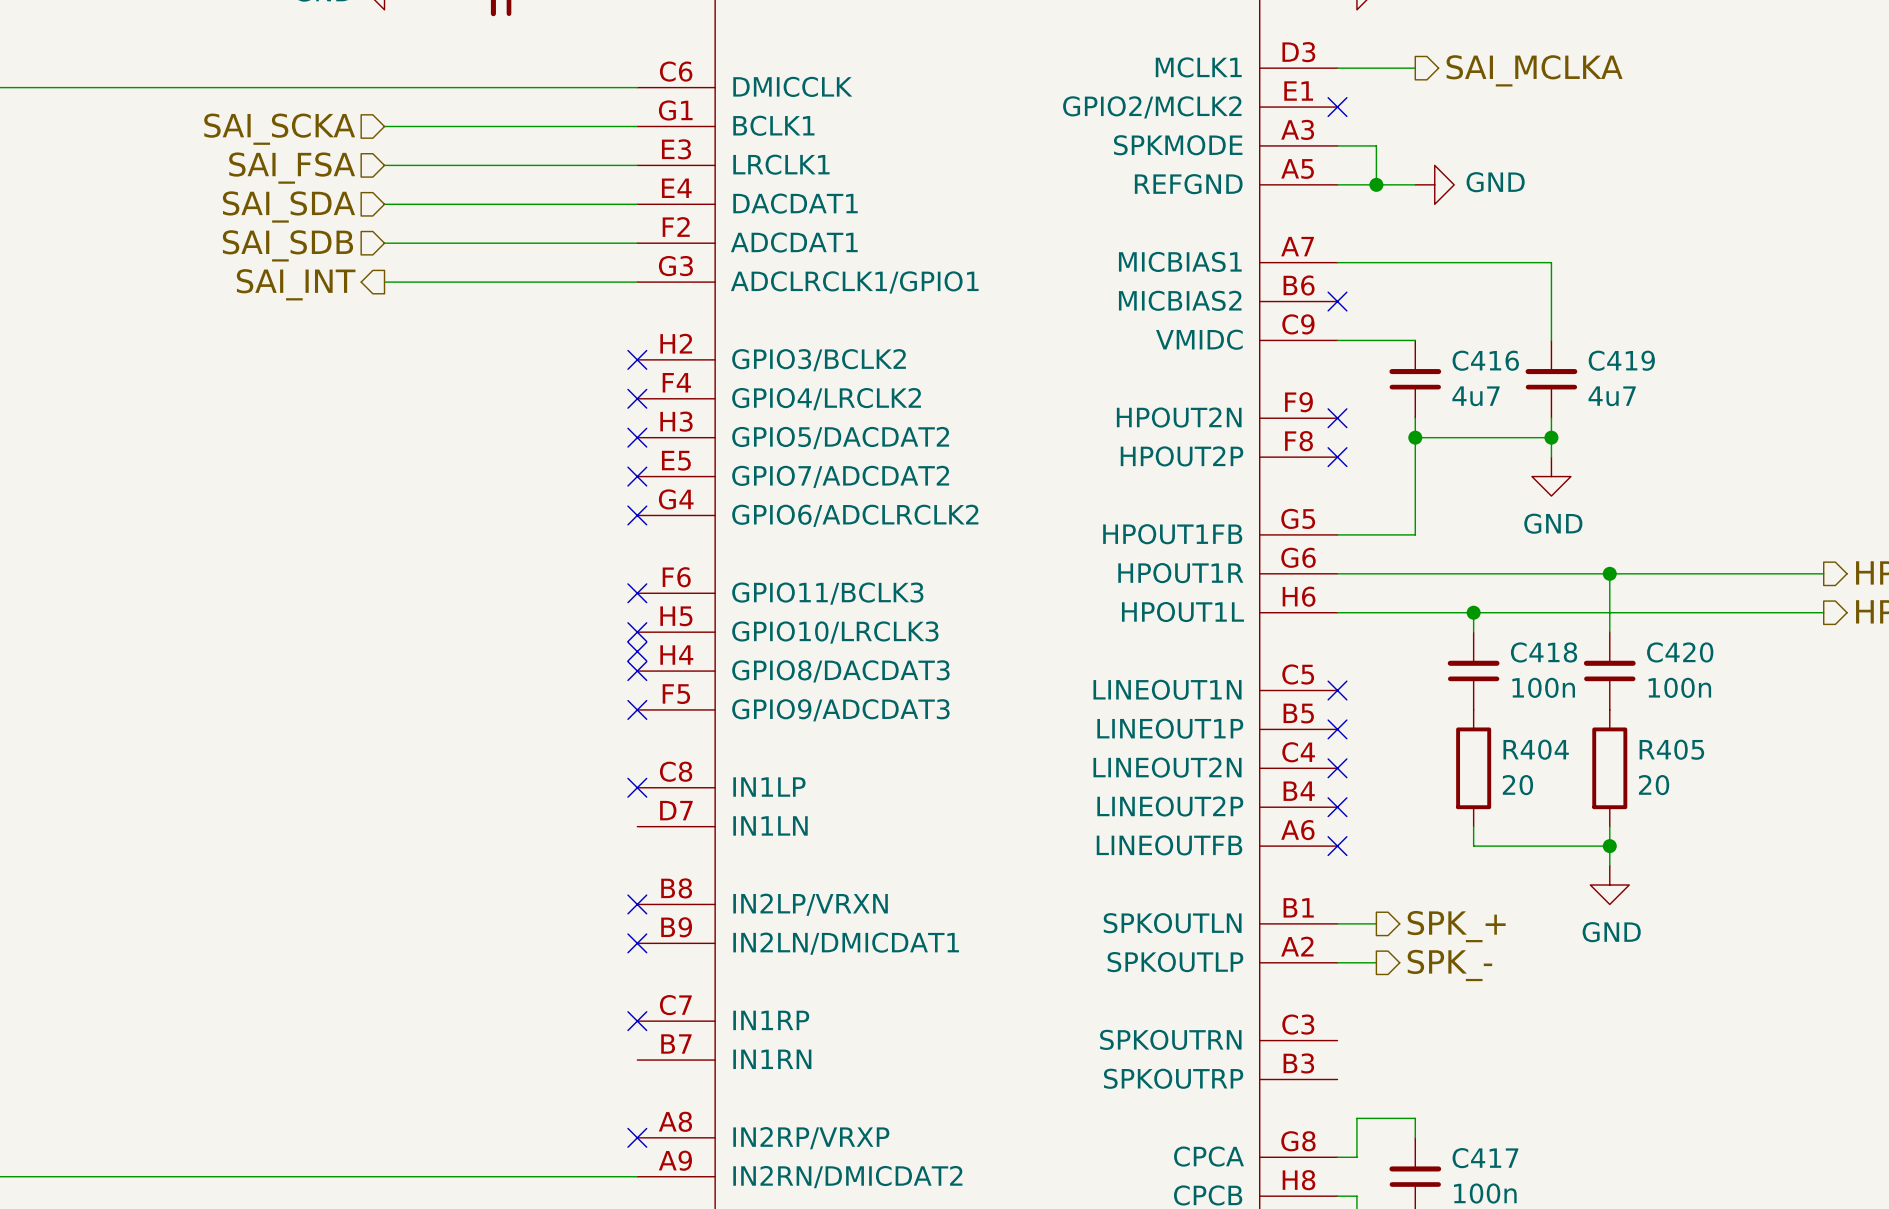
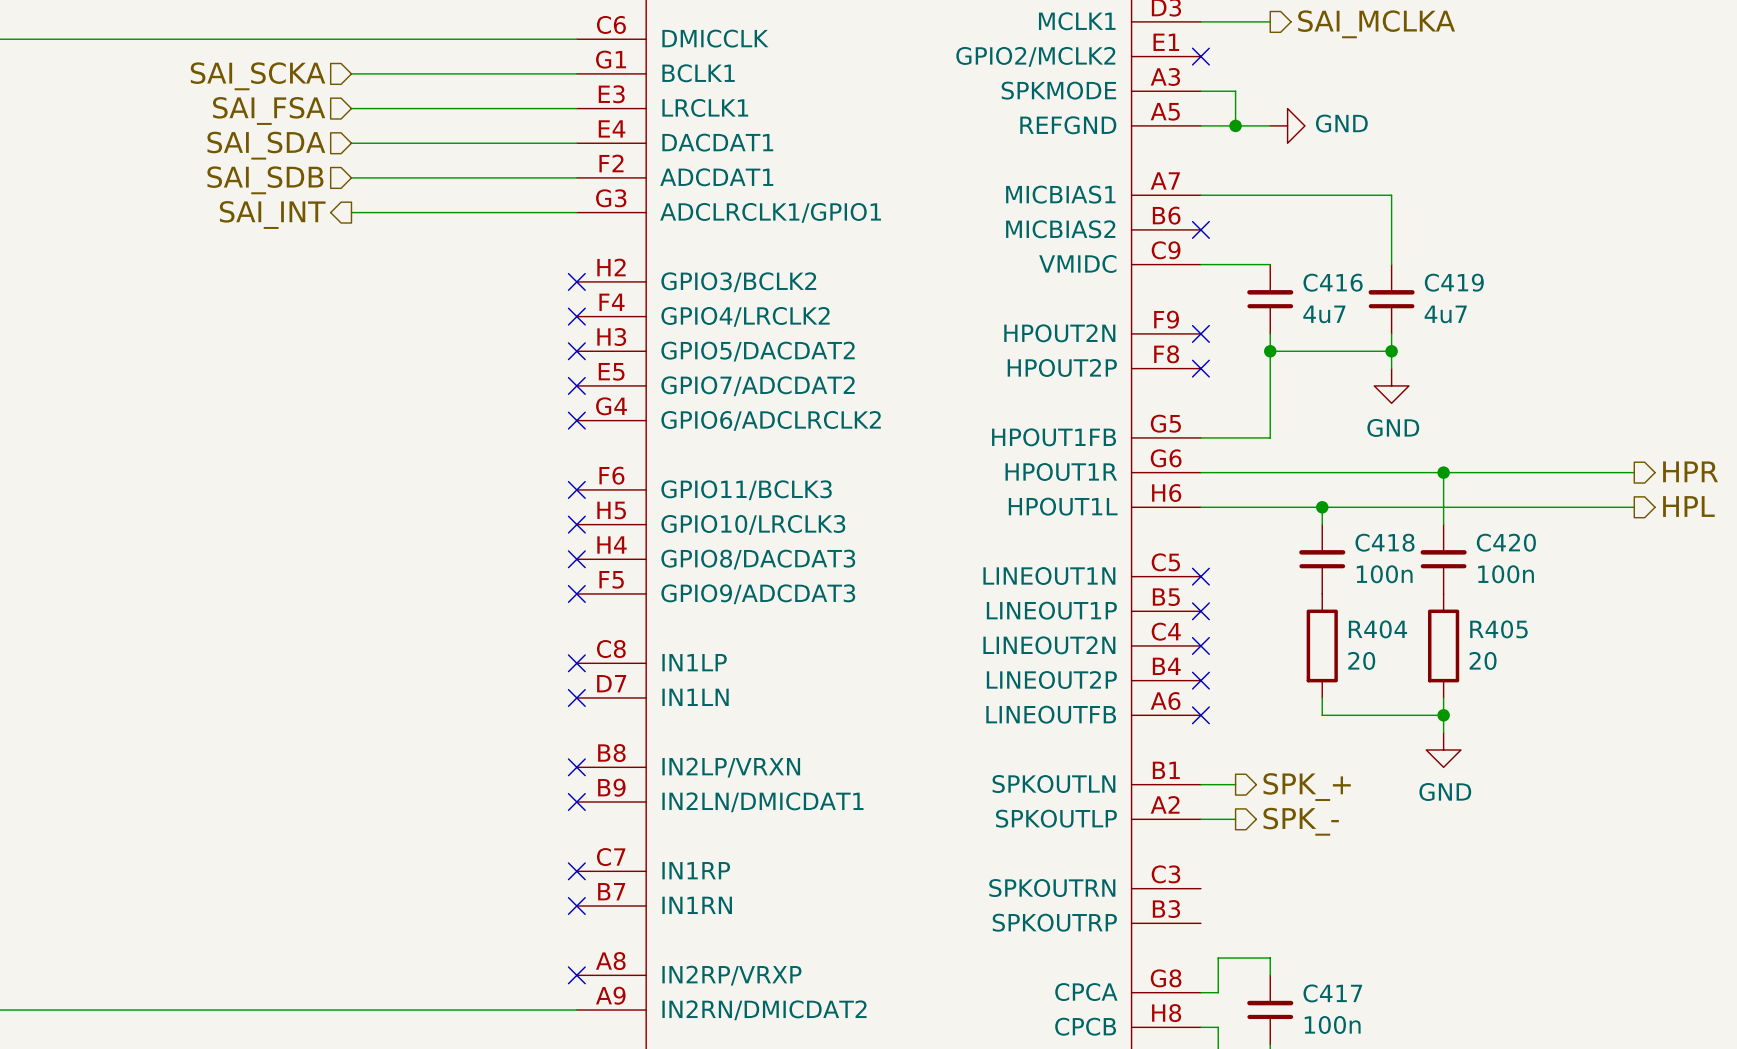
no-connect mark: (637, 651) -> none
no-connect mark: none -> (576, 697)
no-connect mark: none -> (576, 906)

